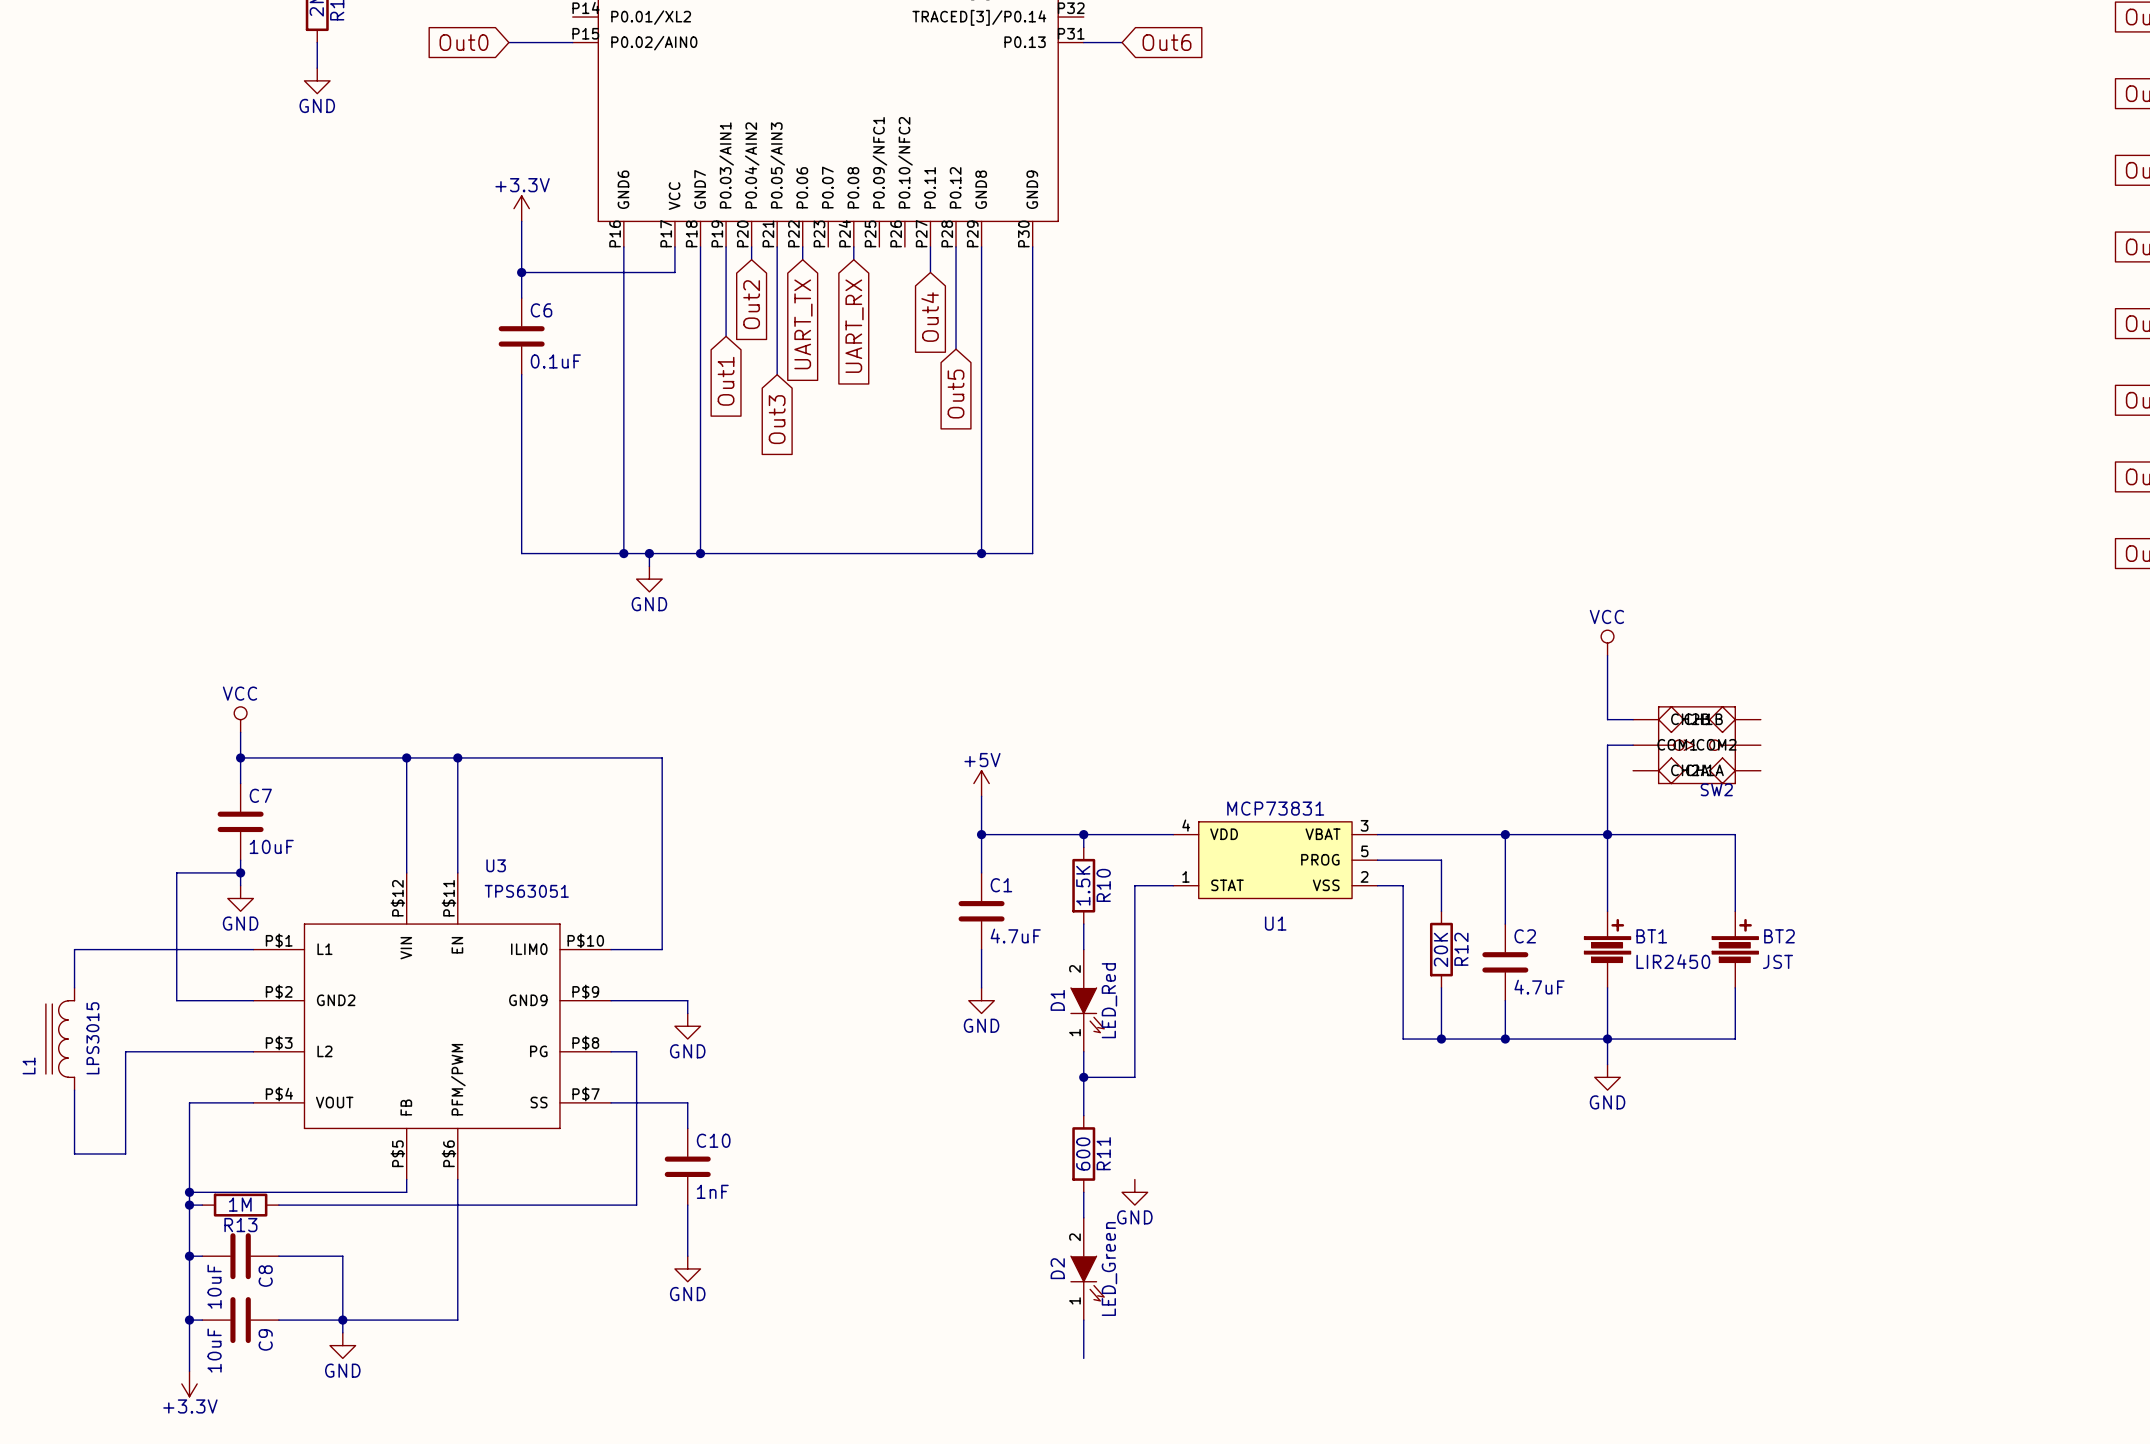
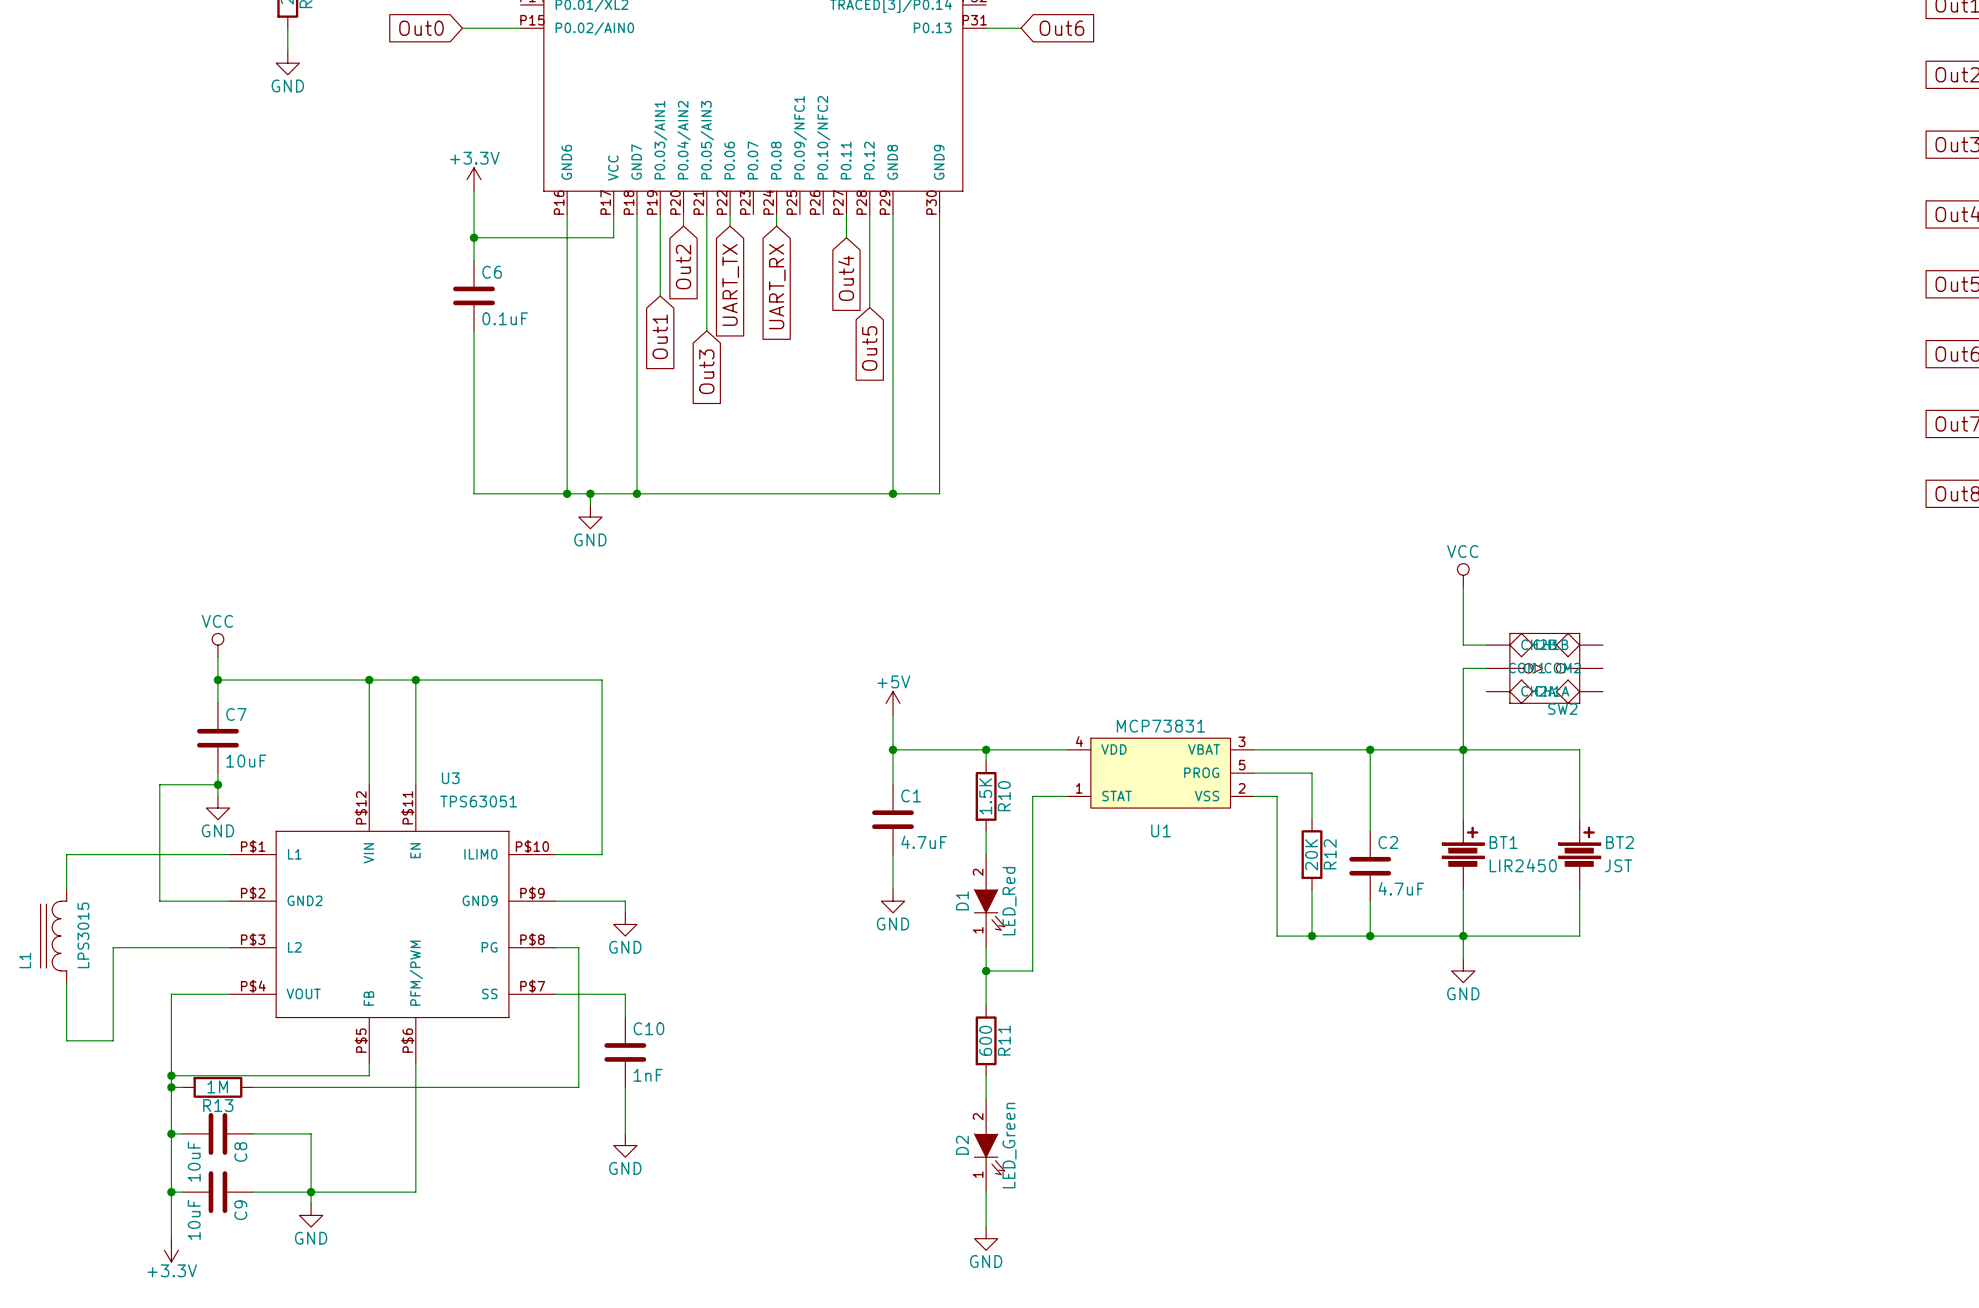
power symbol position: GND (1134, 1192) -> GND (986, 1238)

